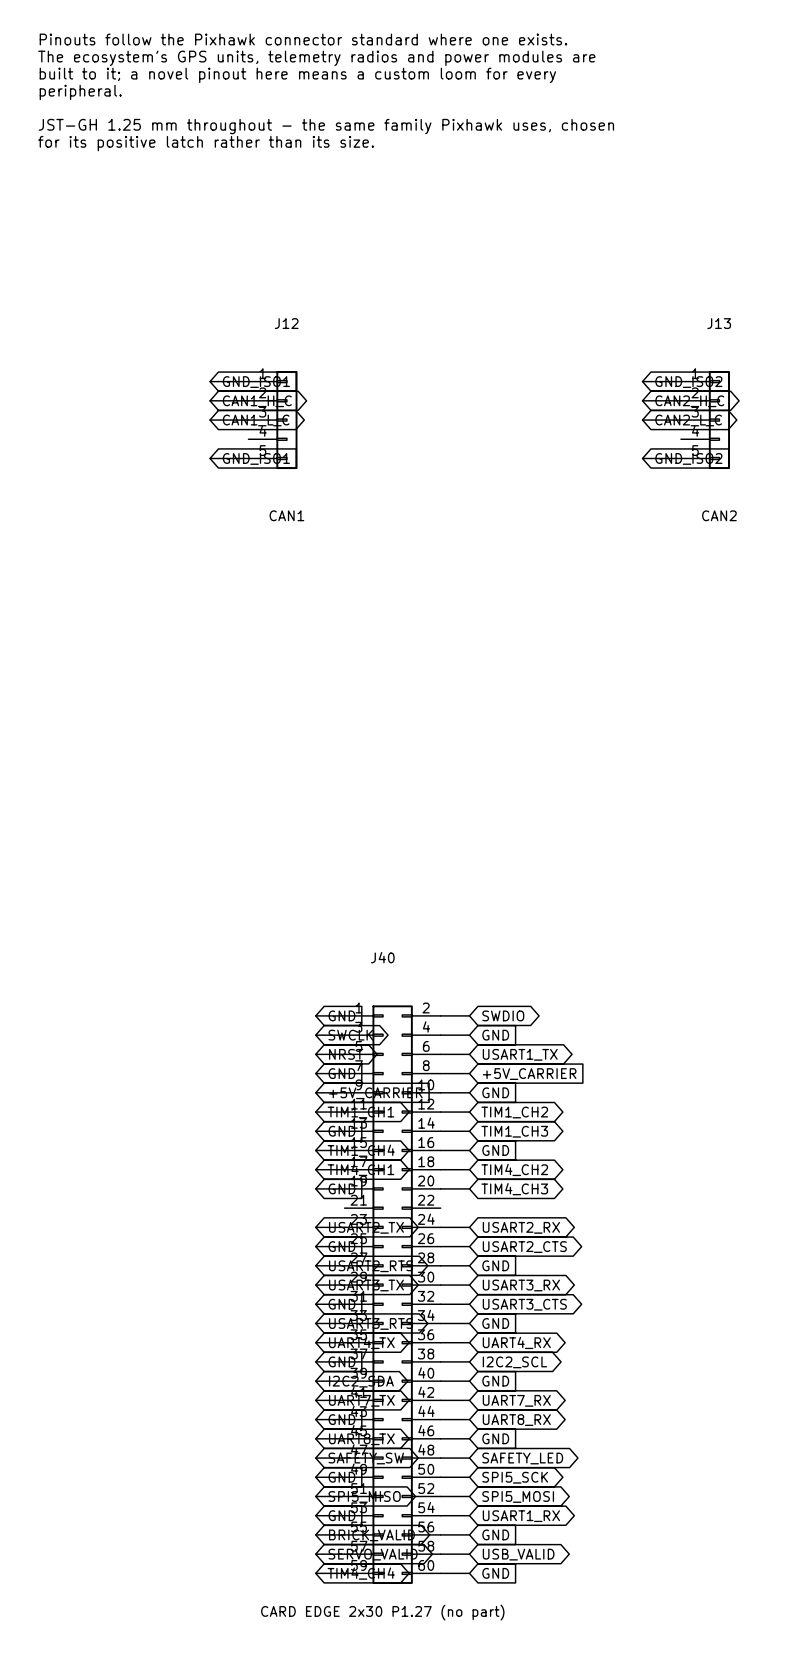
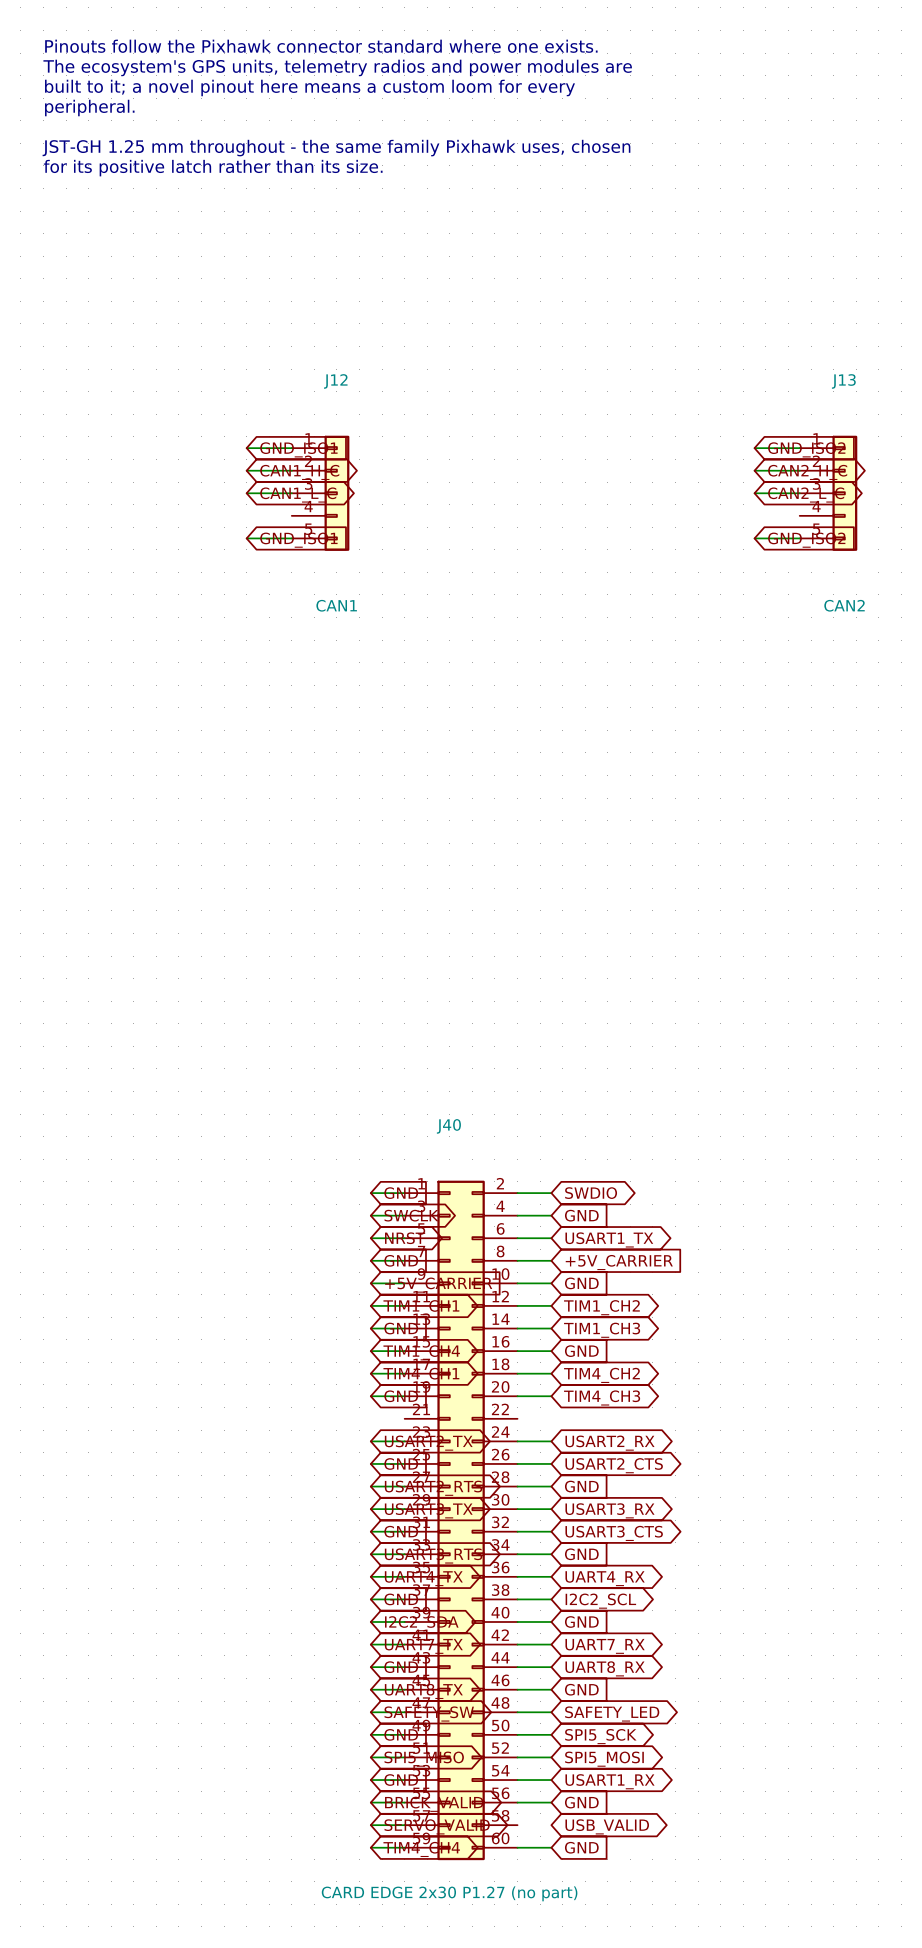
wire: (440, 1554) (469, 1554) -> none

